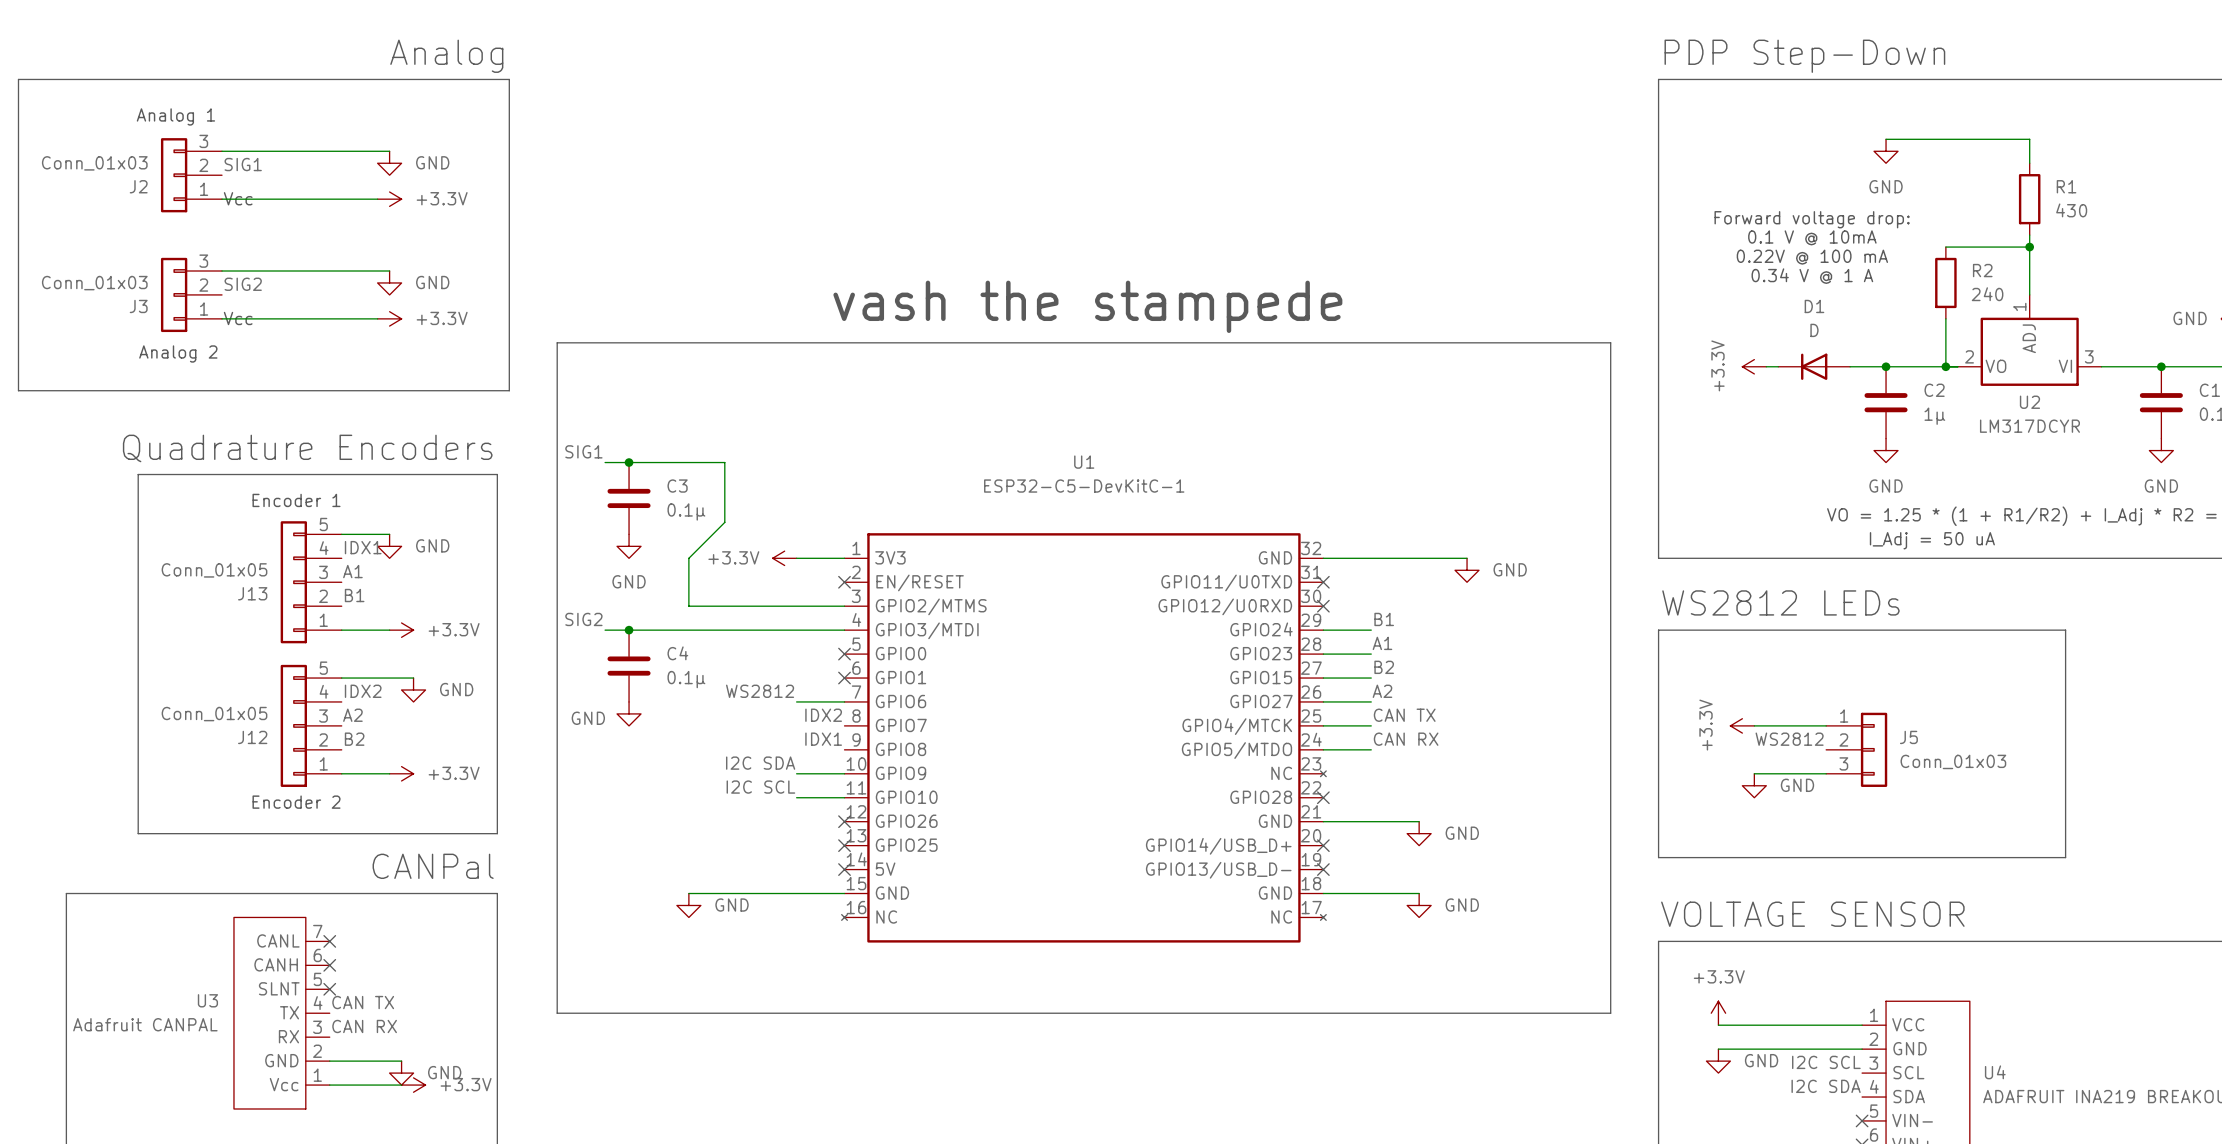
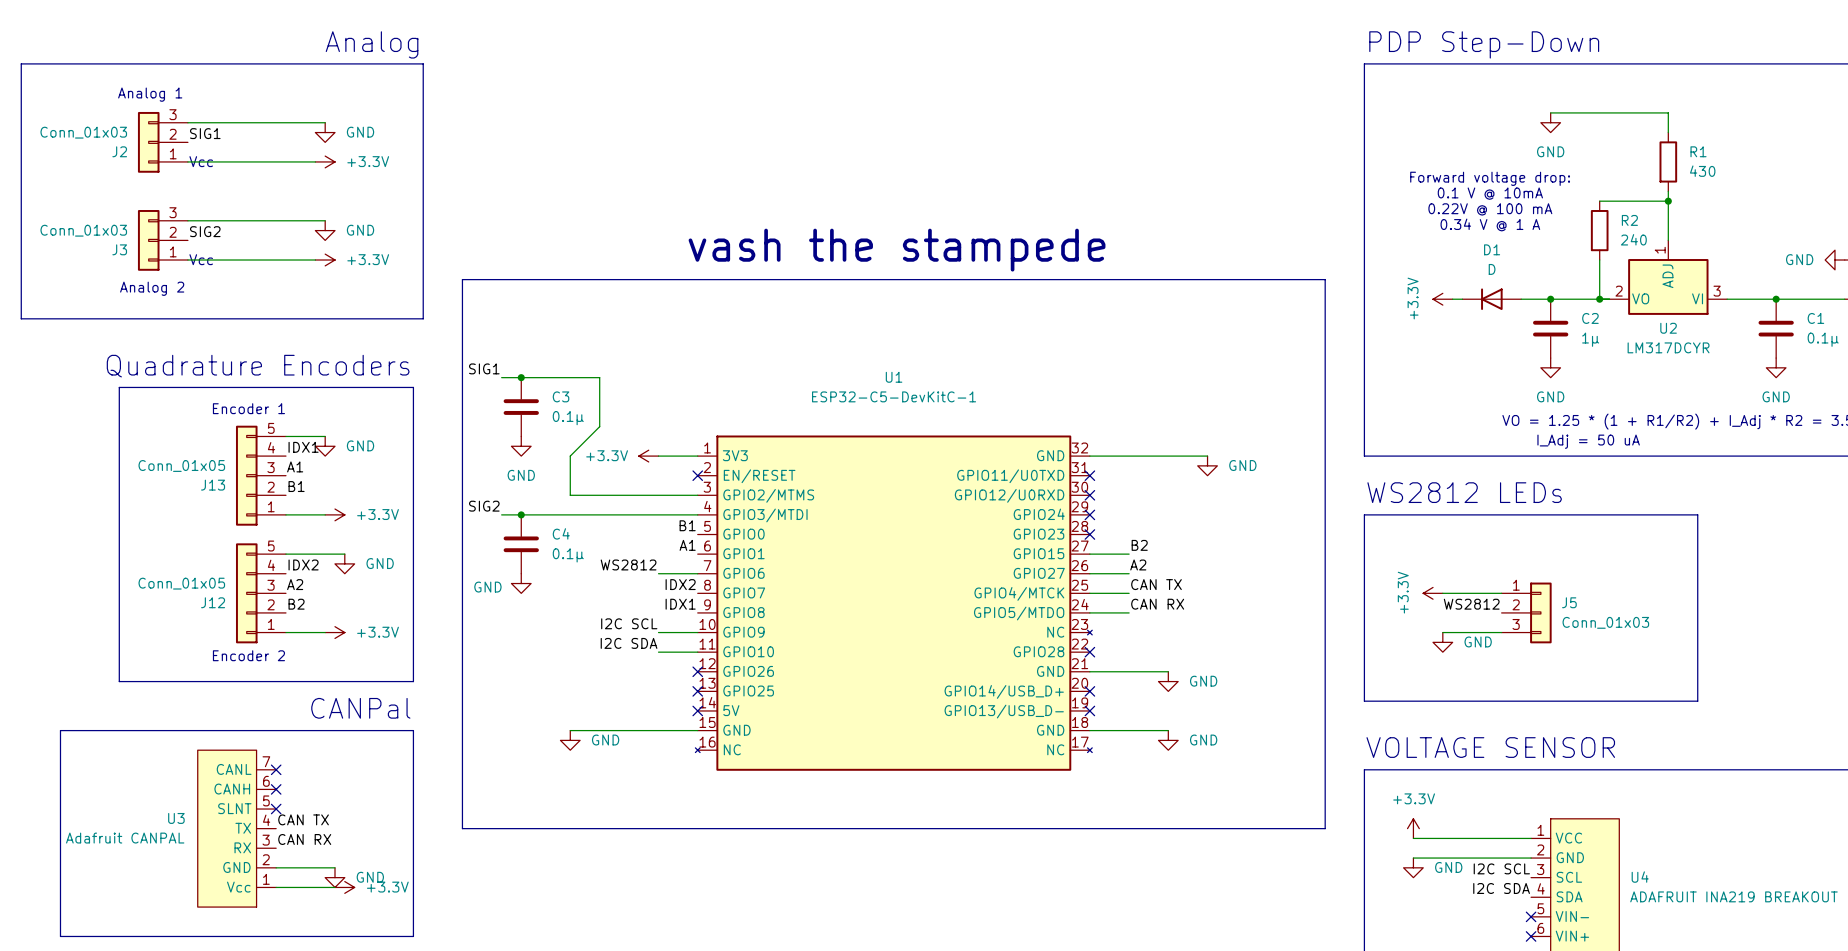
label: B1 (1384, 619) -> none
wire: (1323, 630) (1371, 630) -> none
no-connect mark: none -> (1089, 514)
label: none -> B1 (687, 525)
label: A1 (1382, 643) -> none
no-connect mark: (844, 654) -> none
wire: (1323, 654) (1371, 654) -> none
no-connect mark: none -> (1089, 534)
label: none -> A1 (687, 545)
no-connect mark: (844, 678) -> none
label: I2C SDA (760, 763) -> I2C SCL (629, 623)
label: I2C SCL (760, 787) -> I2C SDA (629, 643)

